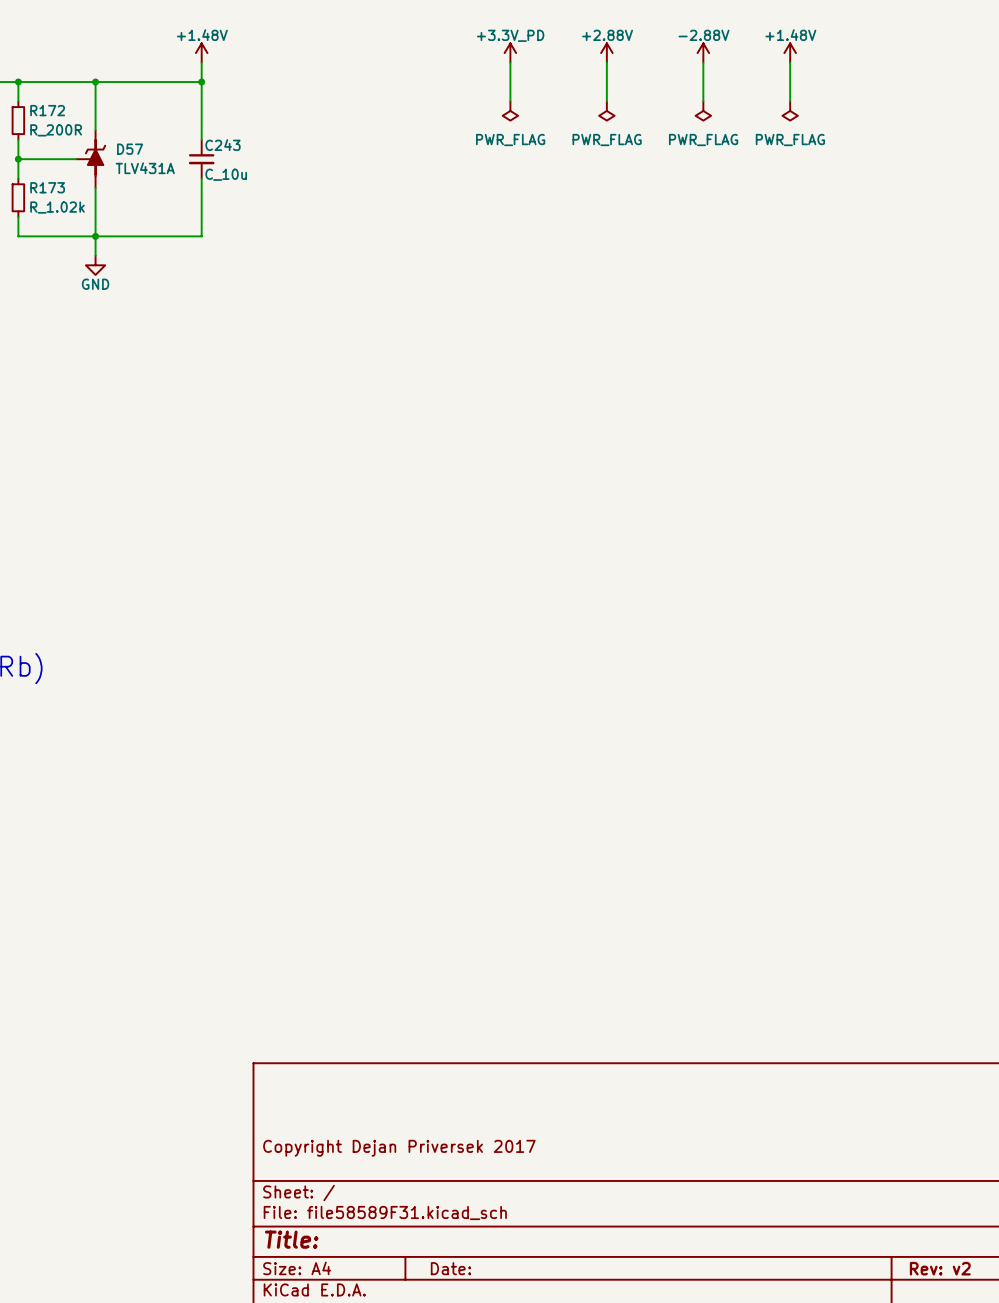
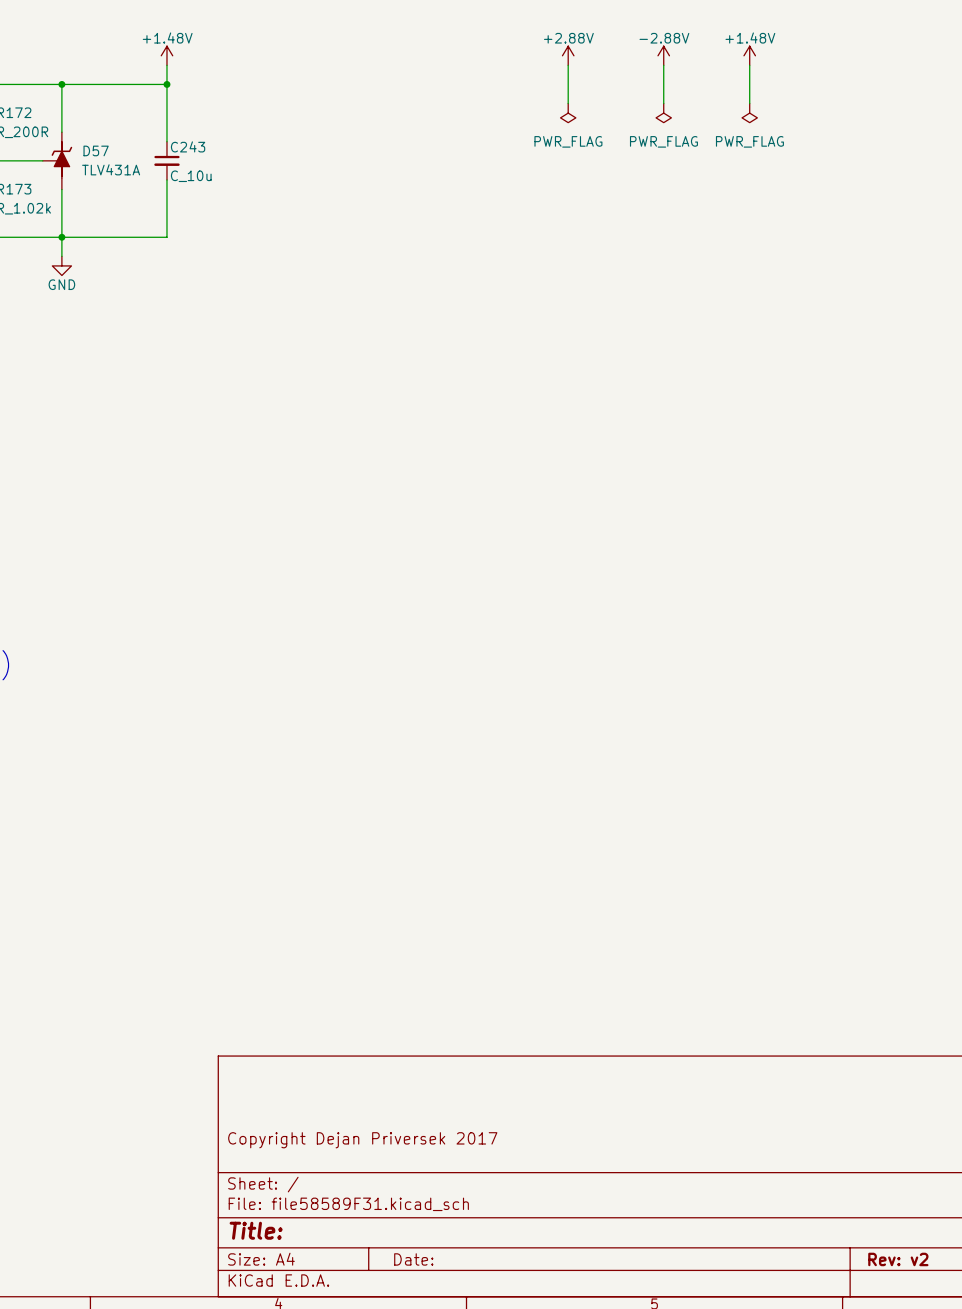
power symbol: +3.3V_PD (510, 53) -> none
wire: (510, 62) (510, 101) -> none
power symbol: PWR_FLAG (510, 110) -> none

